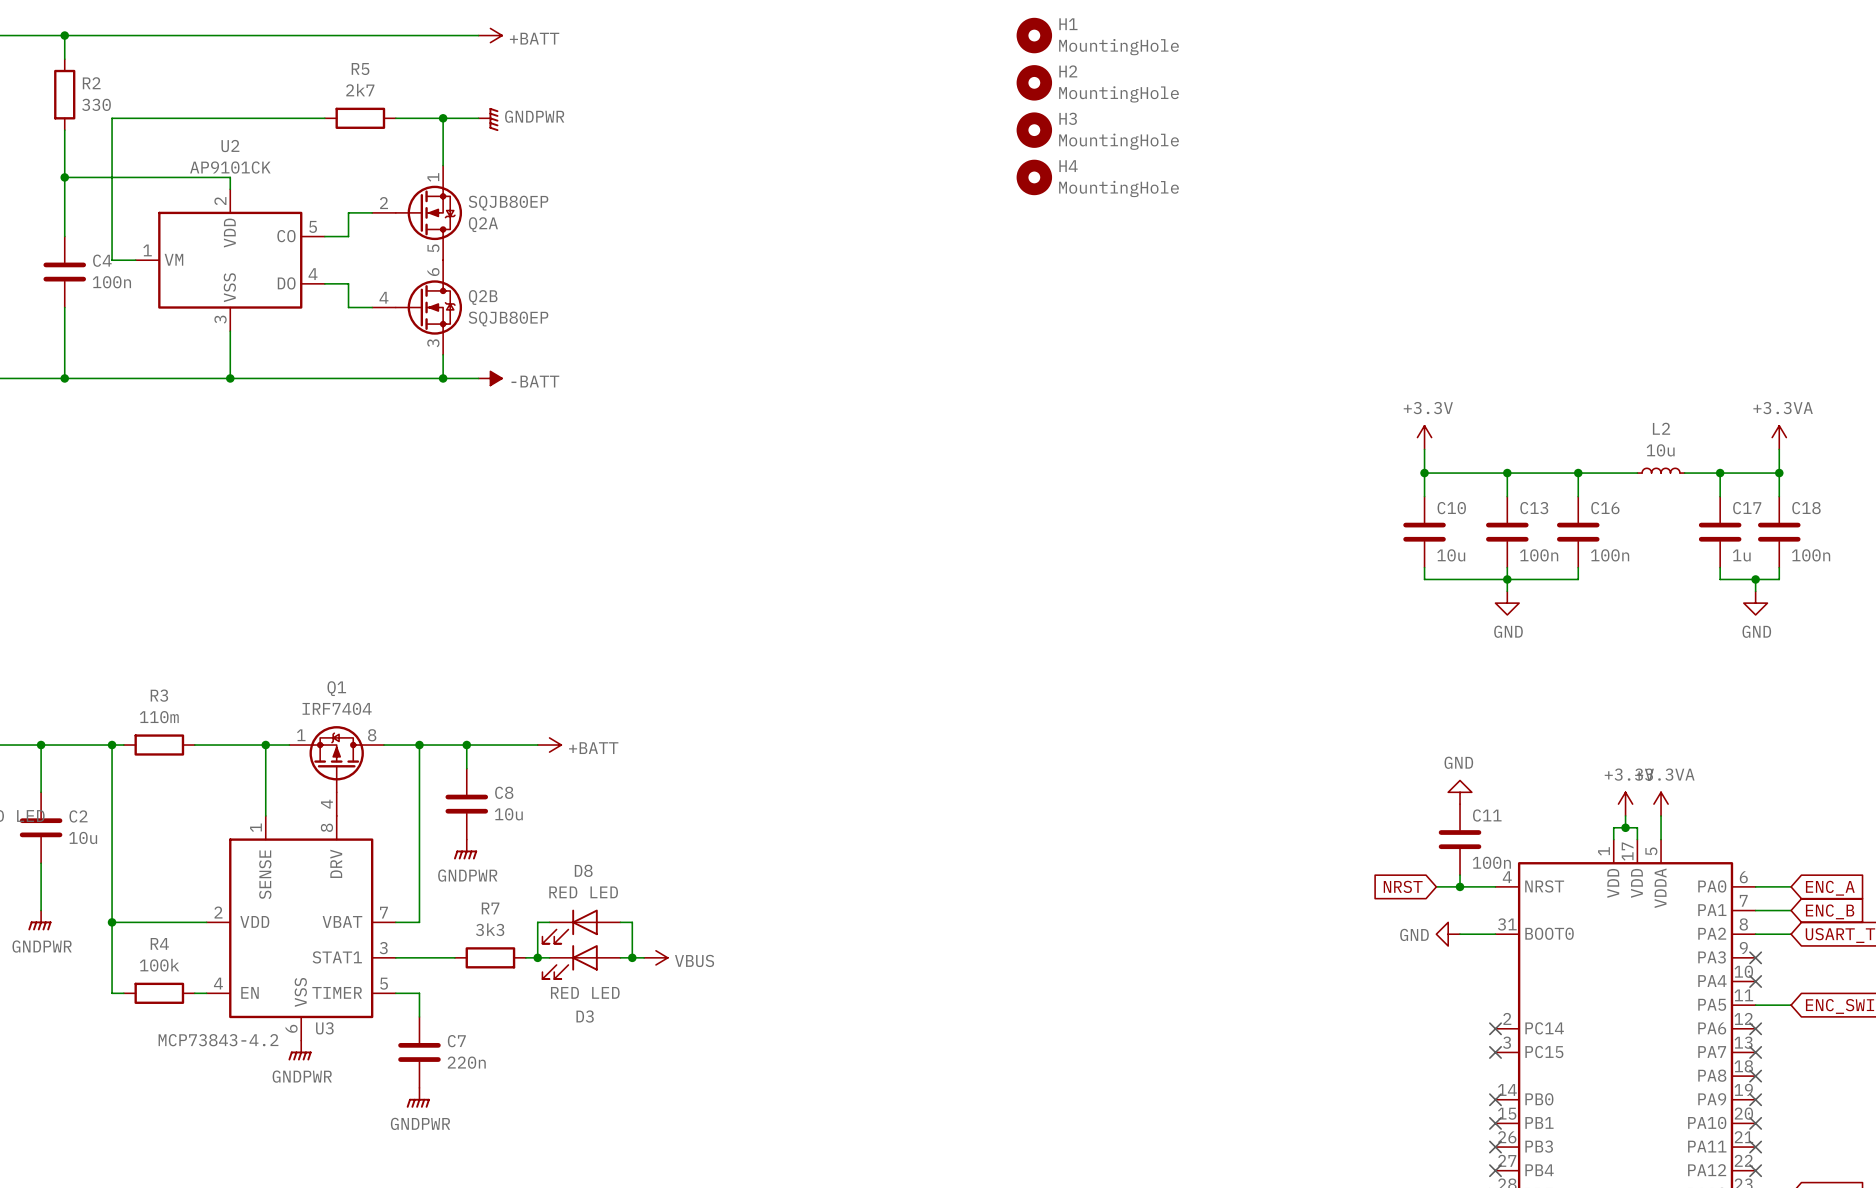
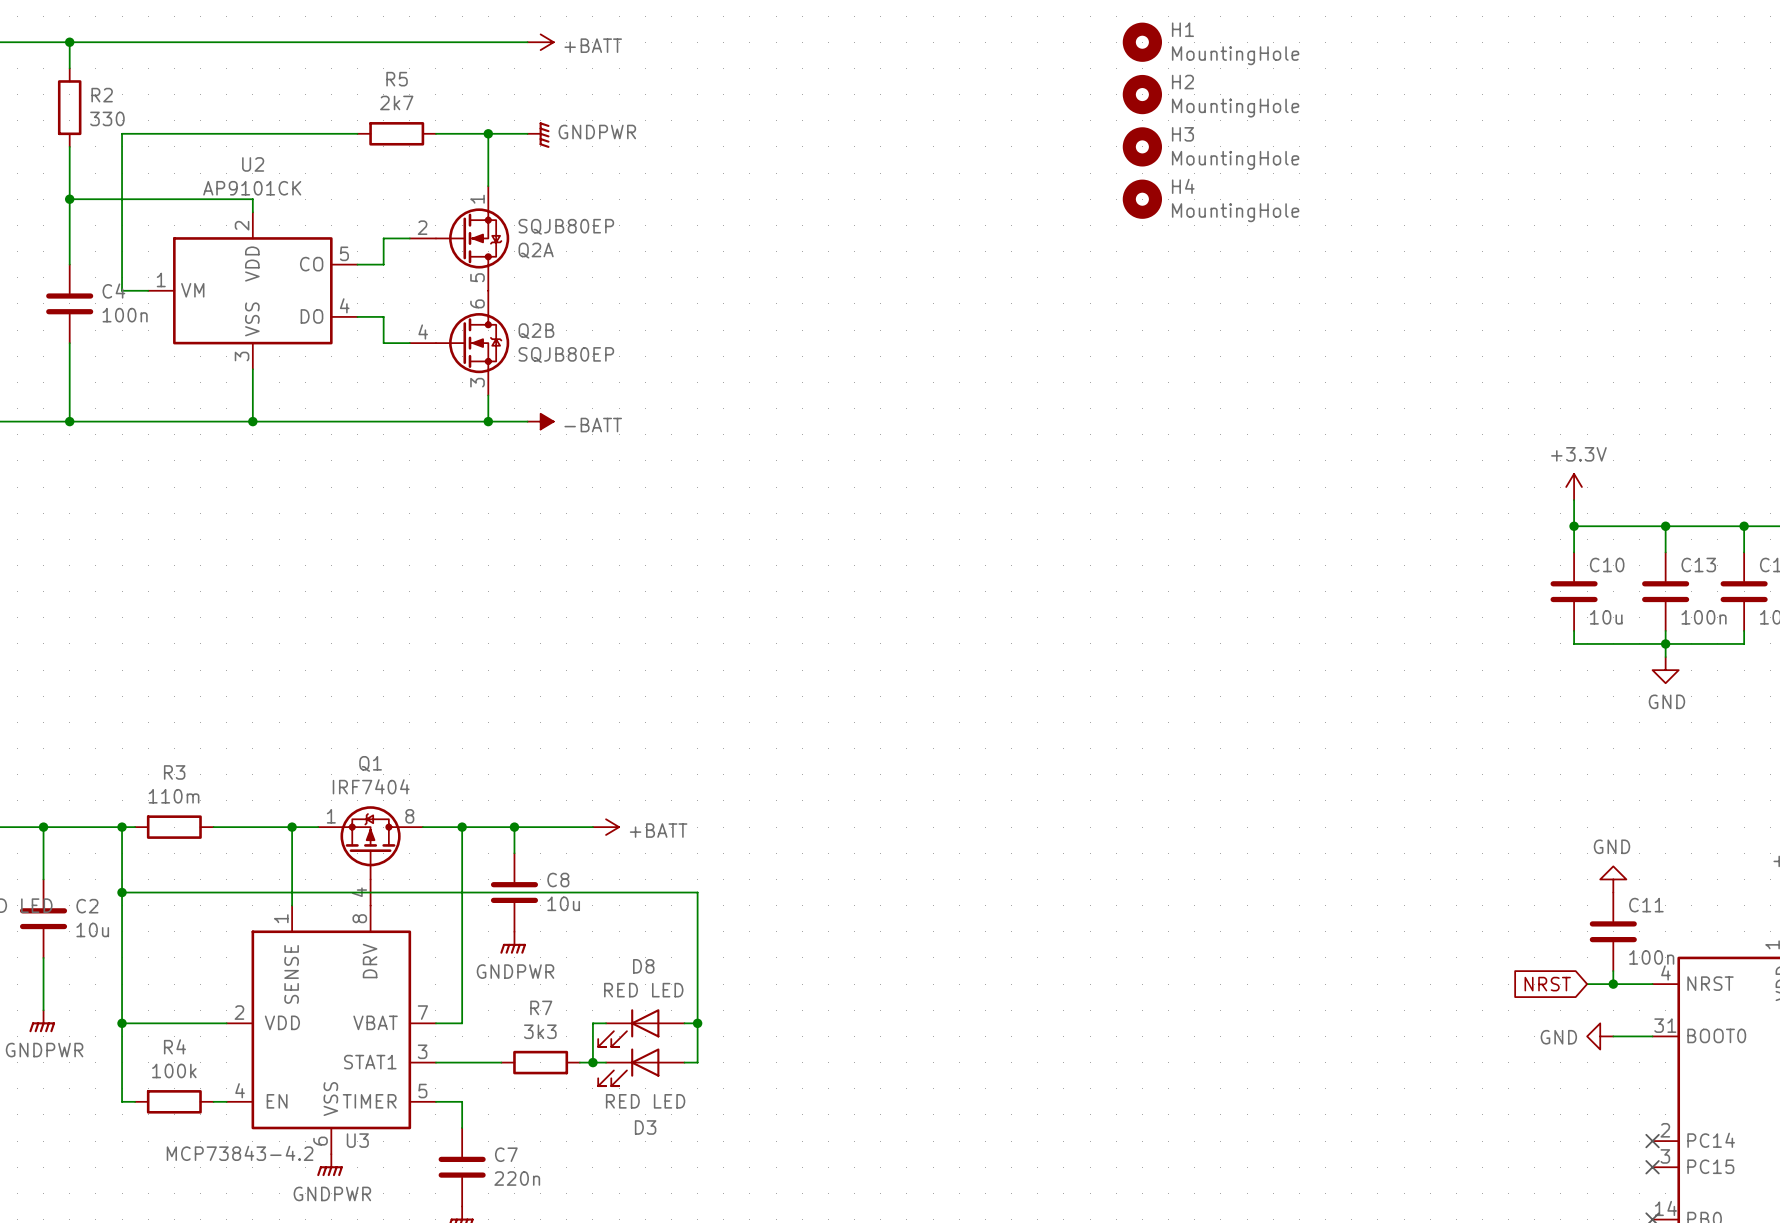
wire: none -> (122, 892) (697, 892) (697, 1023)
junction: none -> (122, 892)
wire: (632, 957) (644, 957) -> none
junction position: (632, 957) -> (697, 1023)
power symbol: VBUS (655, 957) -> none

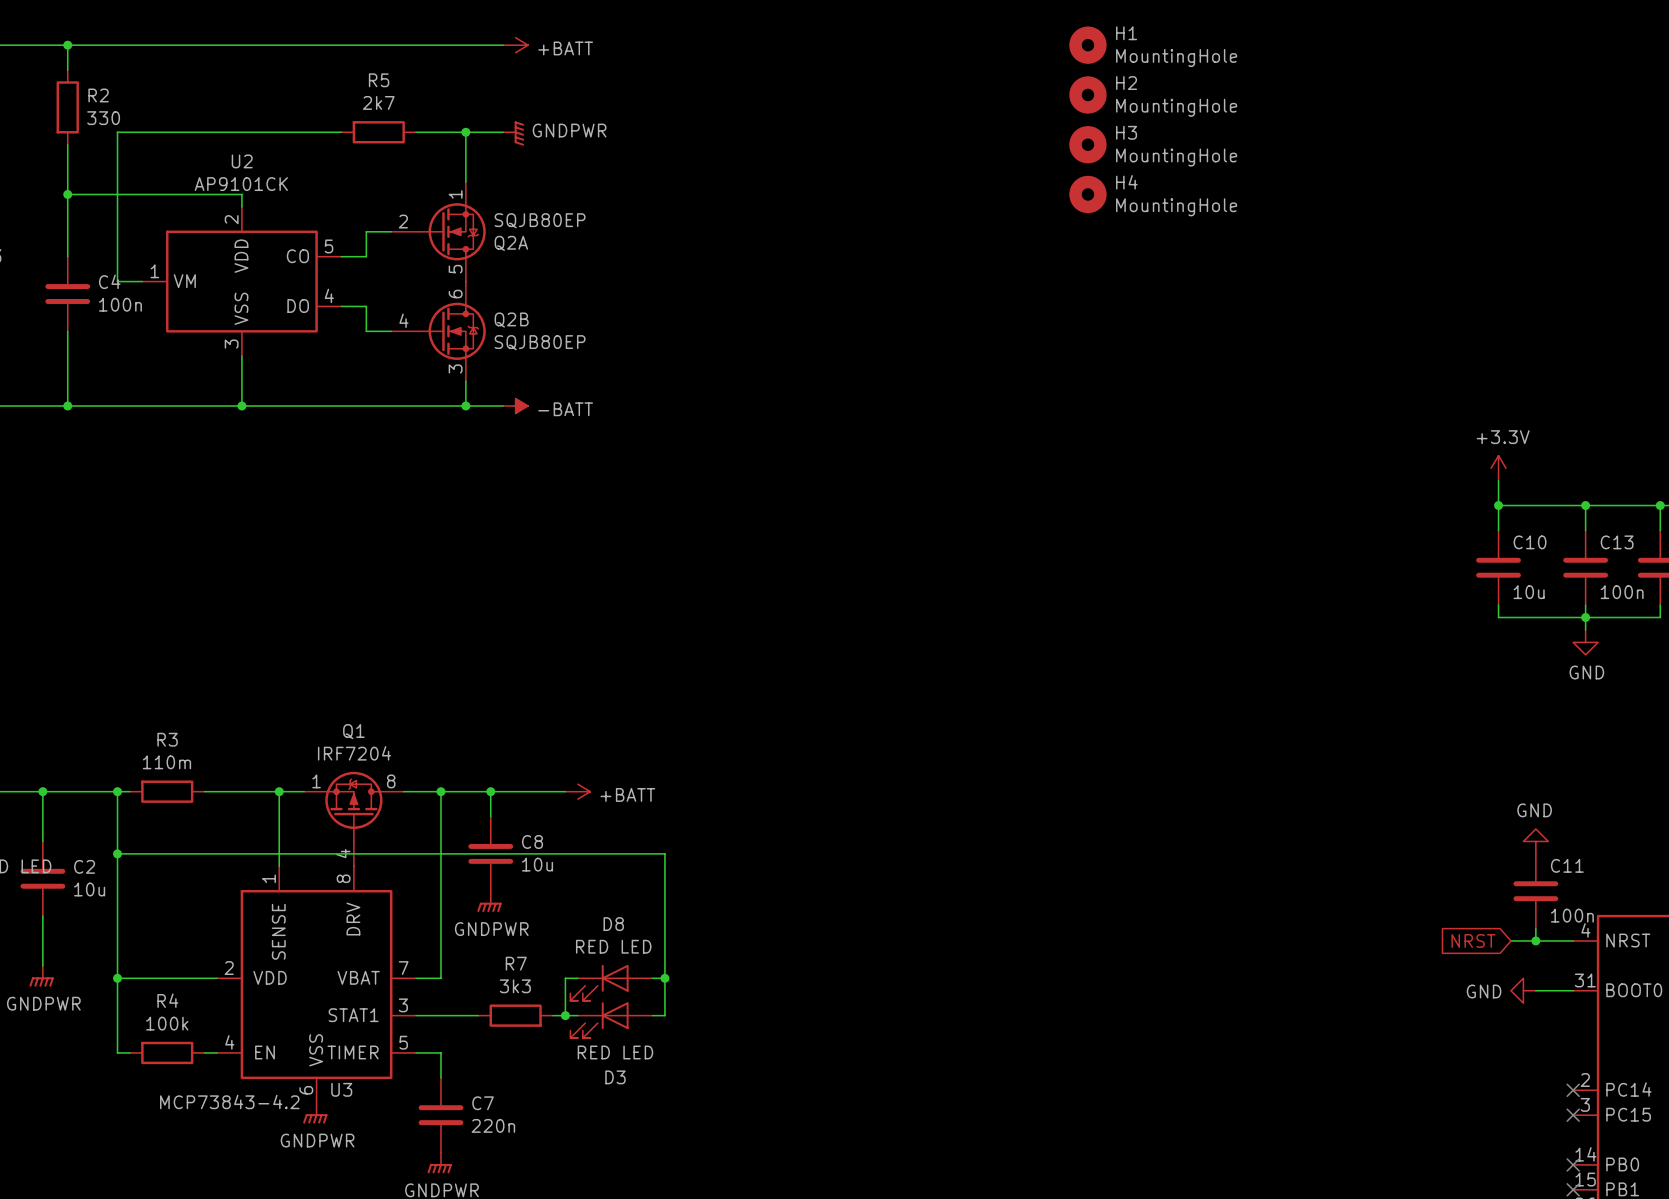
Q1 value: IRF7404 (371, 786) -> IRF7204 (354, 753)

